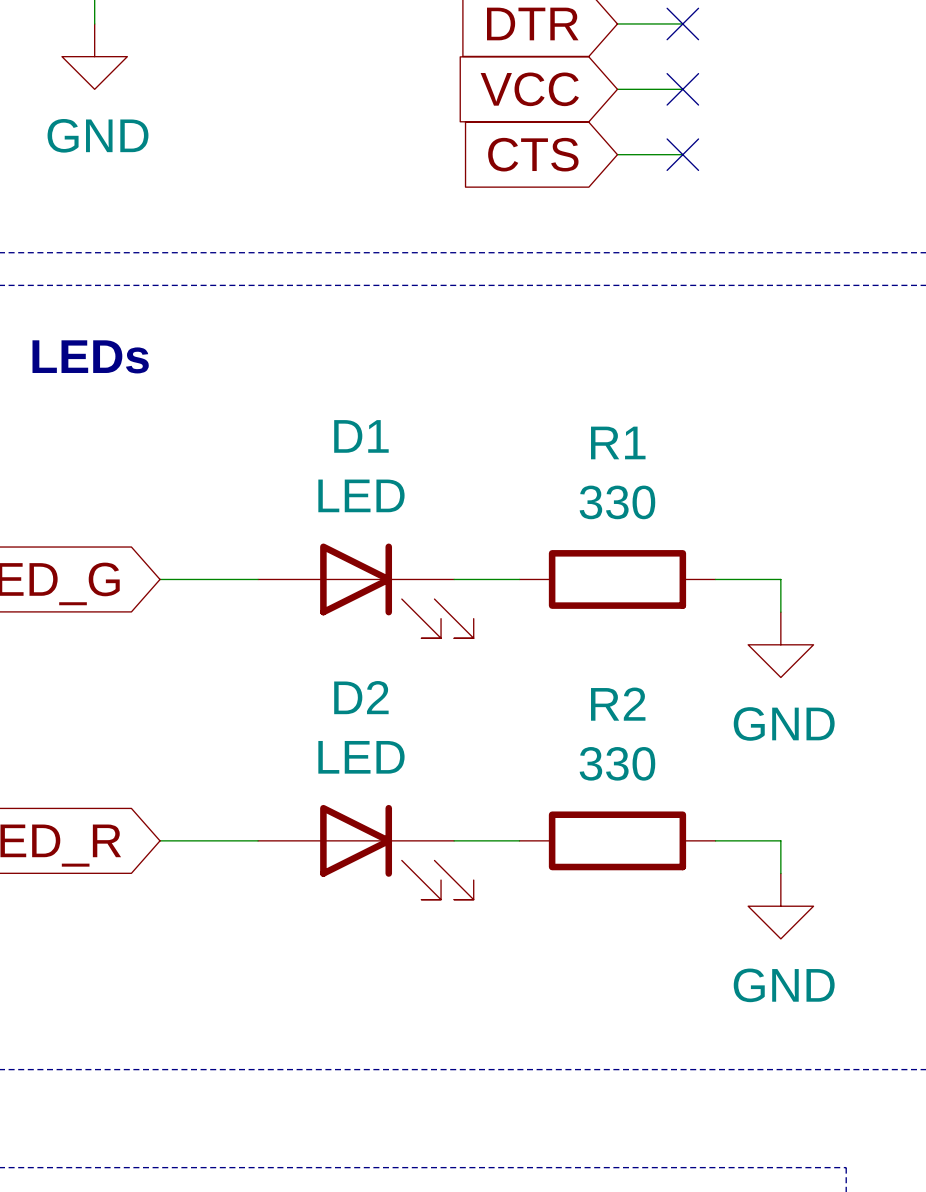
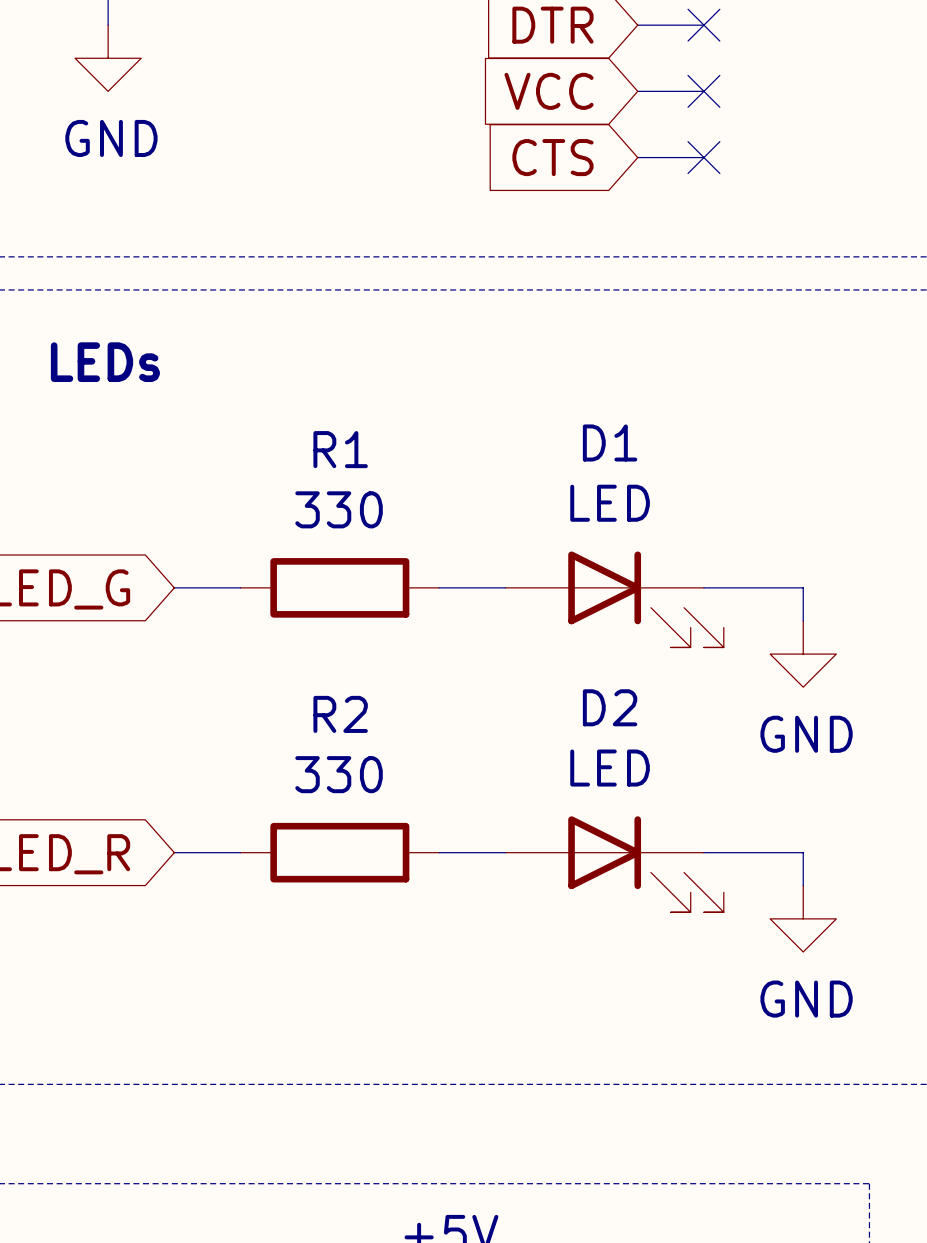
R1 position: (617, 579) -> (339, 587)
D1 position: (365, 590) -> (614, 599)
R2 position: (617, 840) -> (339, 852)
D2 position: (365, 852) -> (614, 864)

